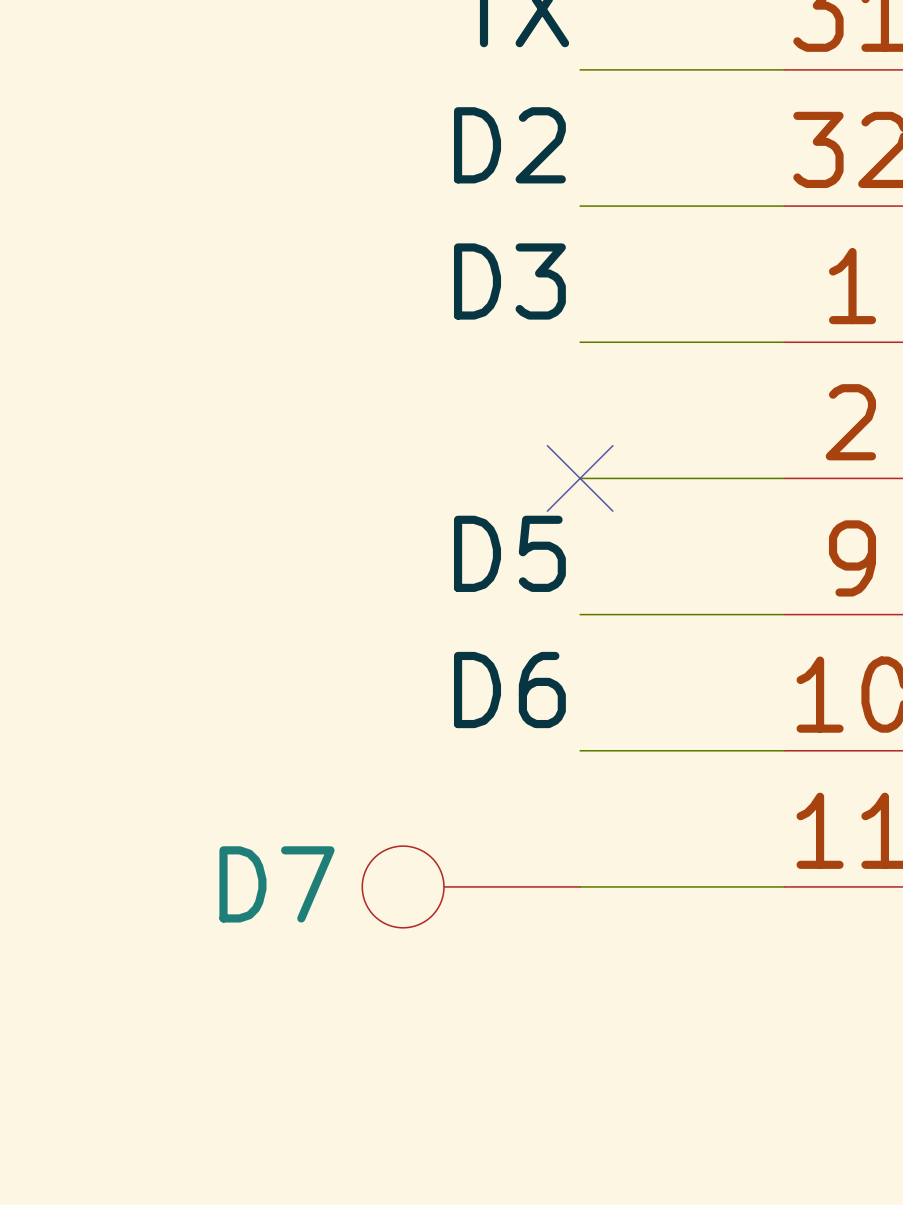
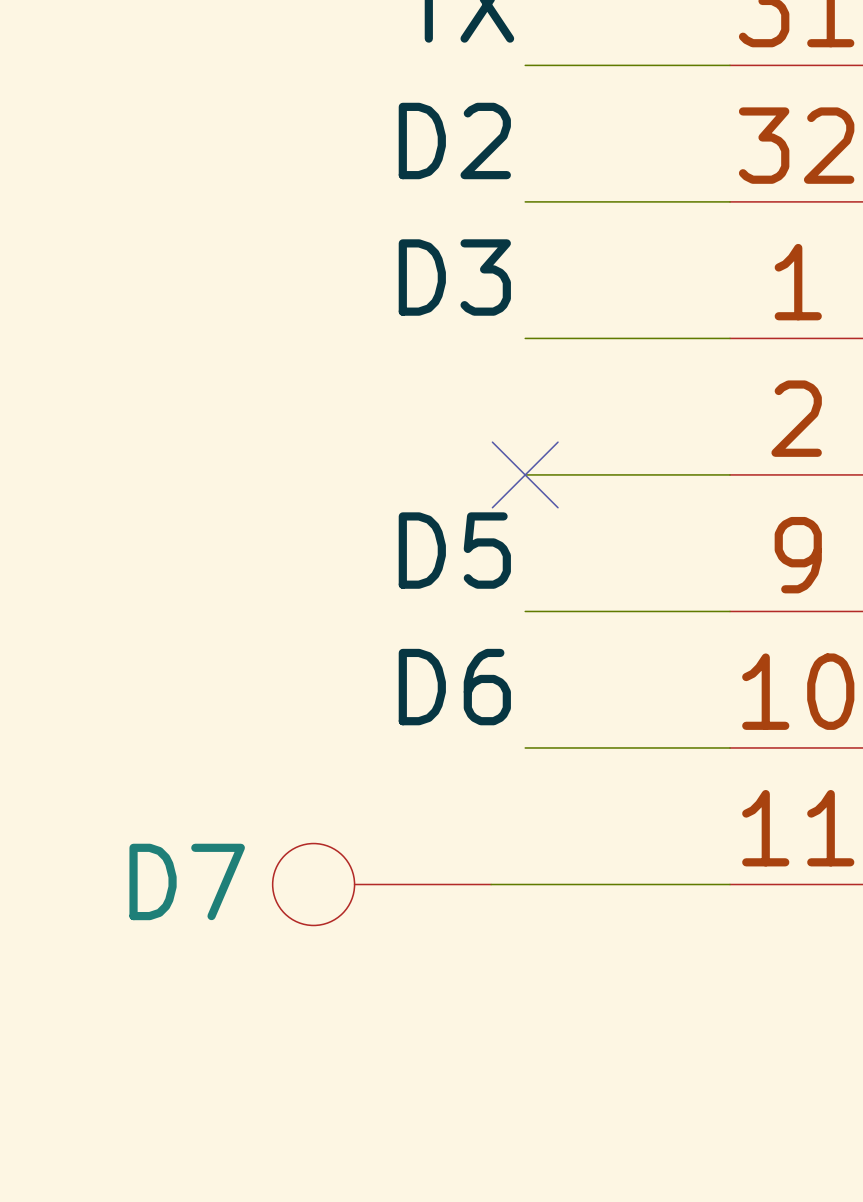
part position: (471, 886) -> (381, 884)

